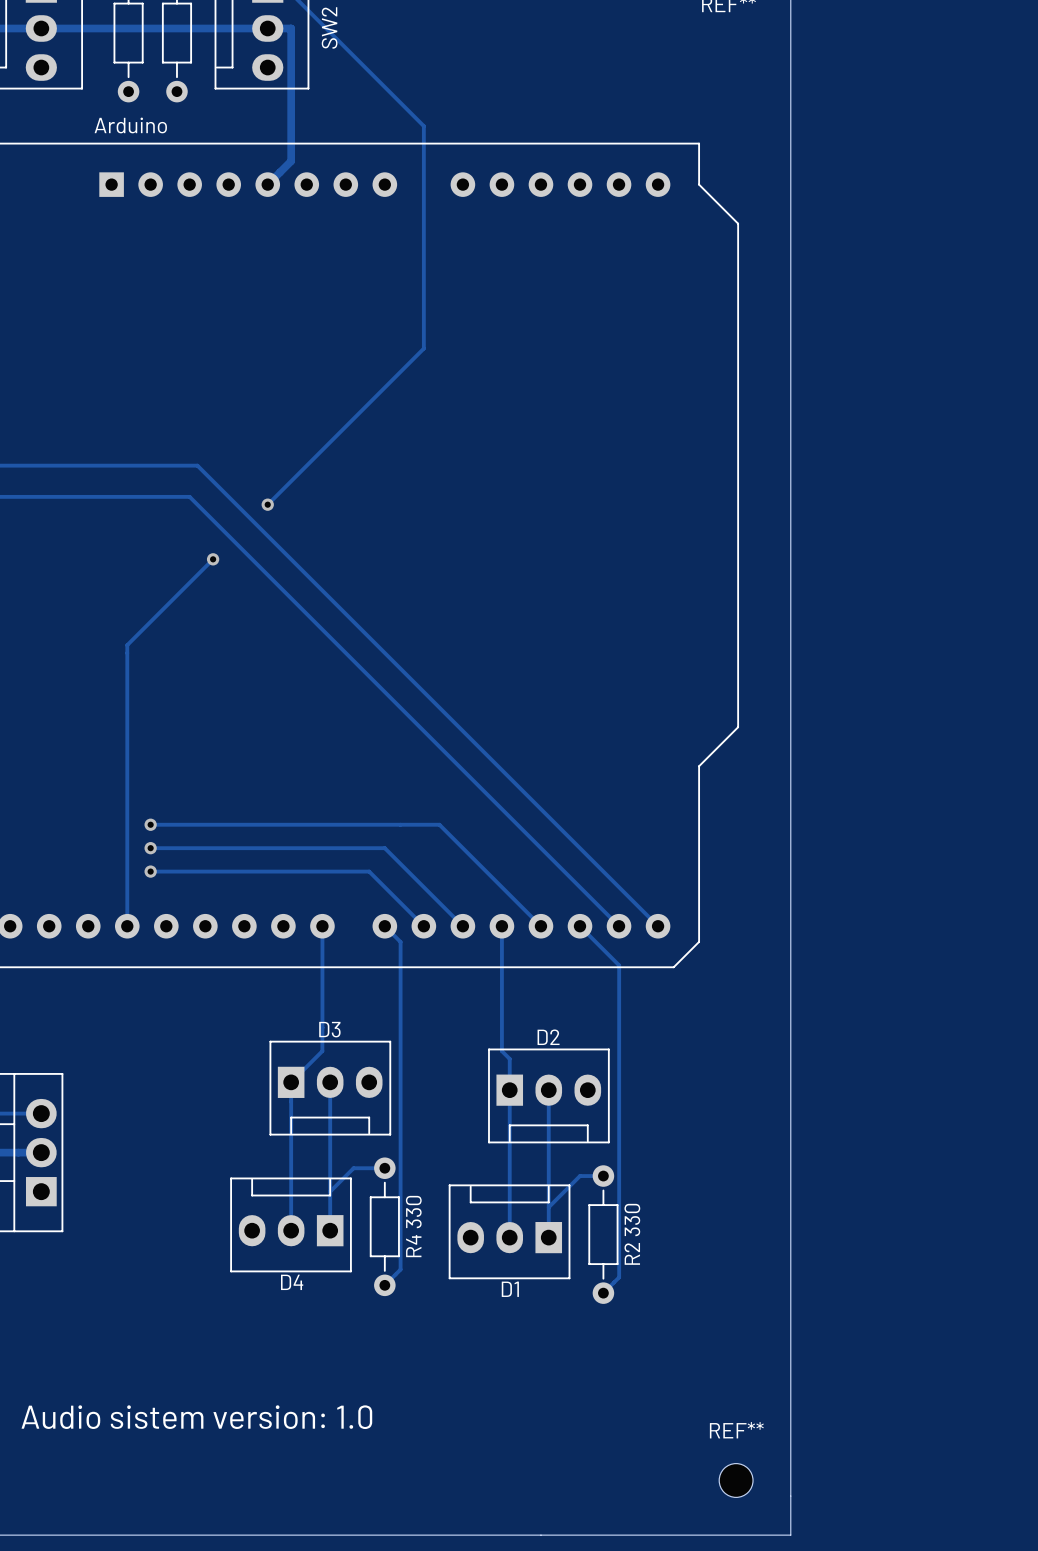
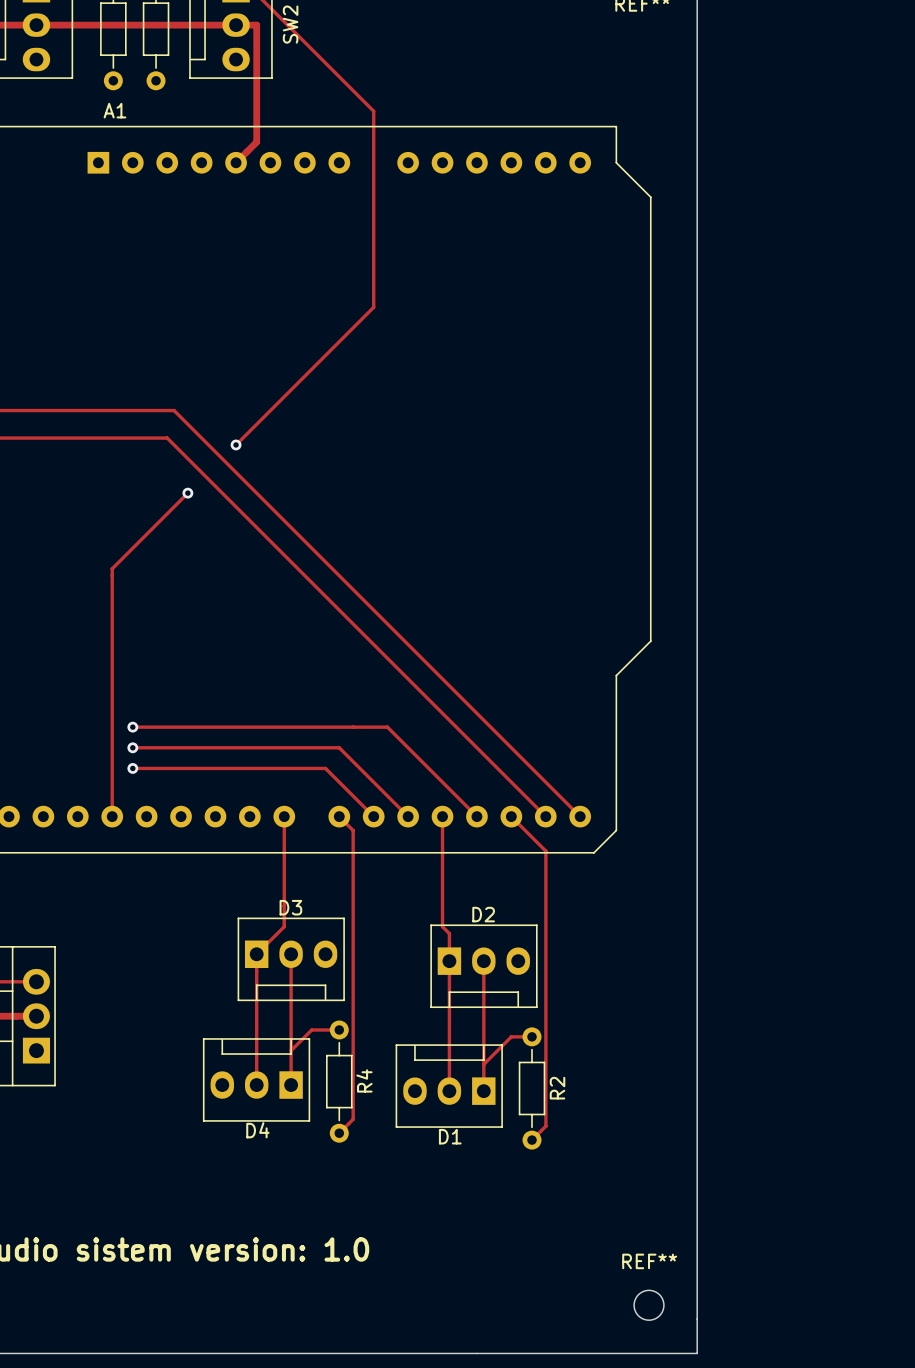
Arduino name: Arduino (130, 125) -> A1 (114, 110)
R4 330 name: R4 330 (413, 1226) -> R4 (364, 1080)
R2 330 name: R2 330 (632, 1234) -> R2 (557, 1088)

